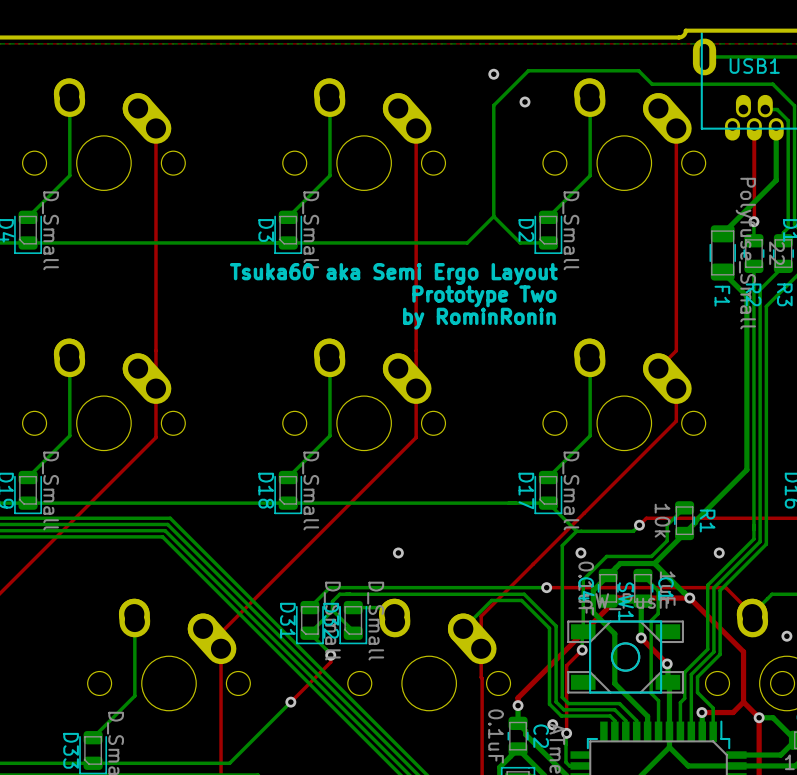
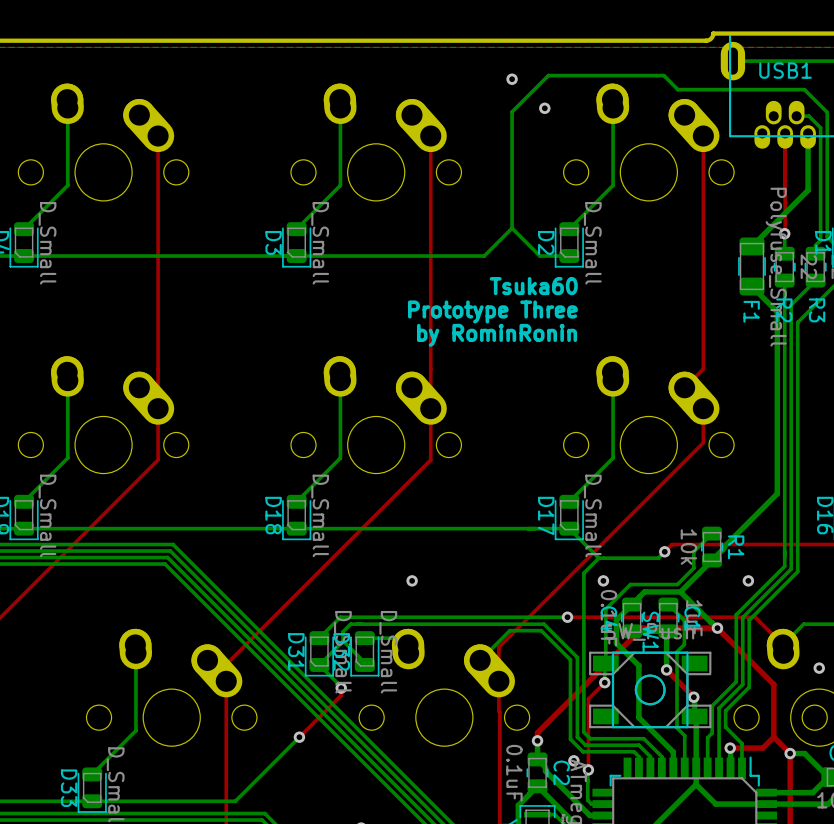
text: Tsuka60 aka Semi Ergo Layout (393, 273) -> Tsuka60 (533, 286)
text: Prototype Two (484, 296) -> Prototype Three (492, 311)

